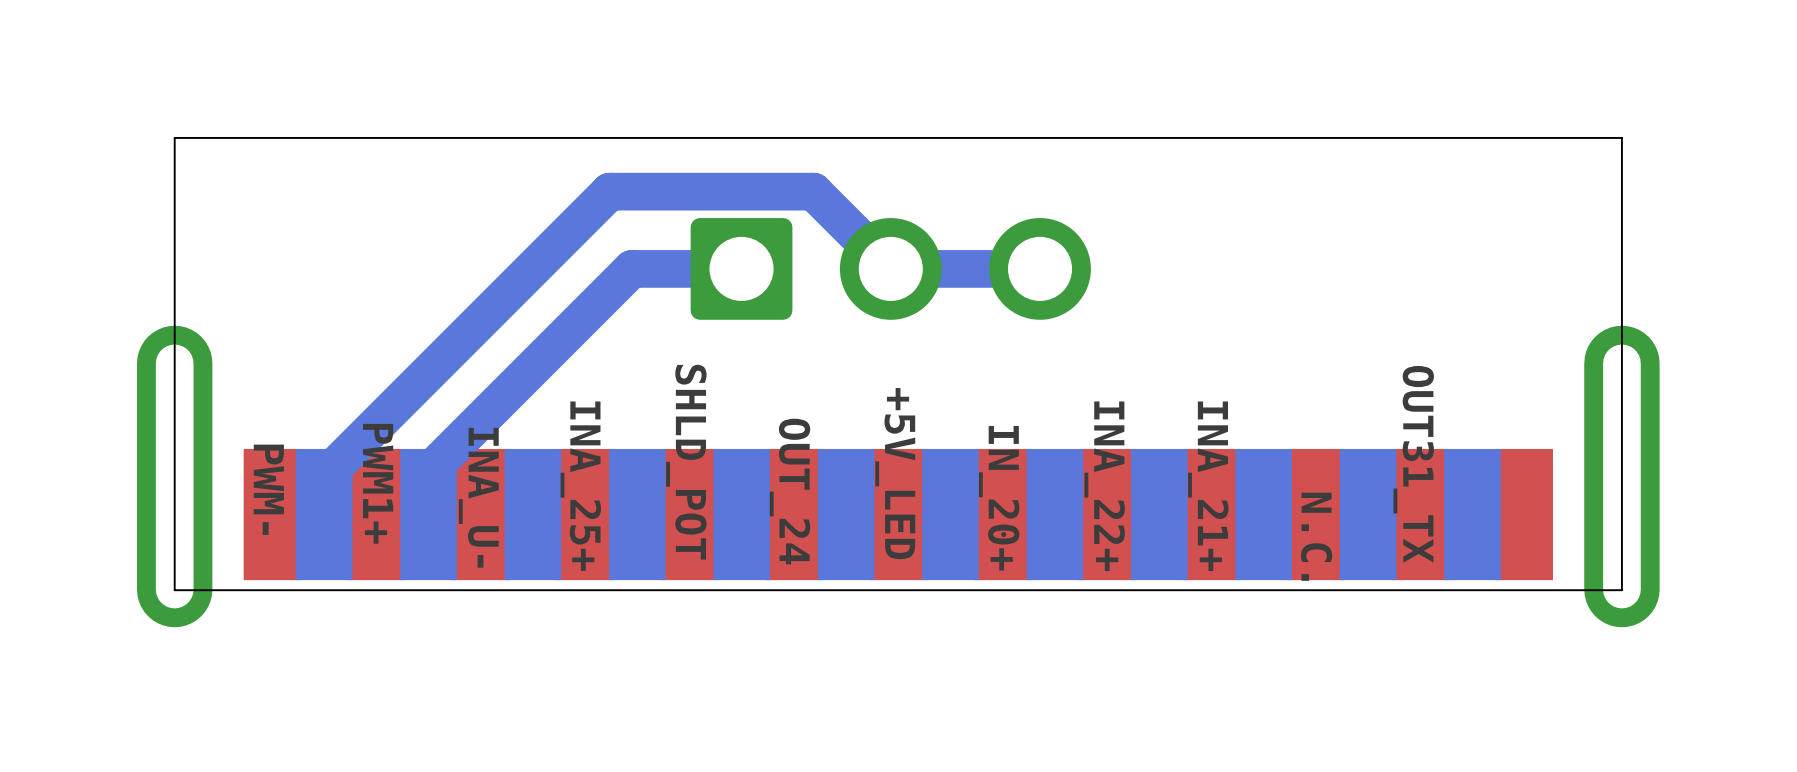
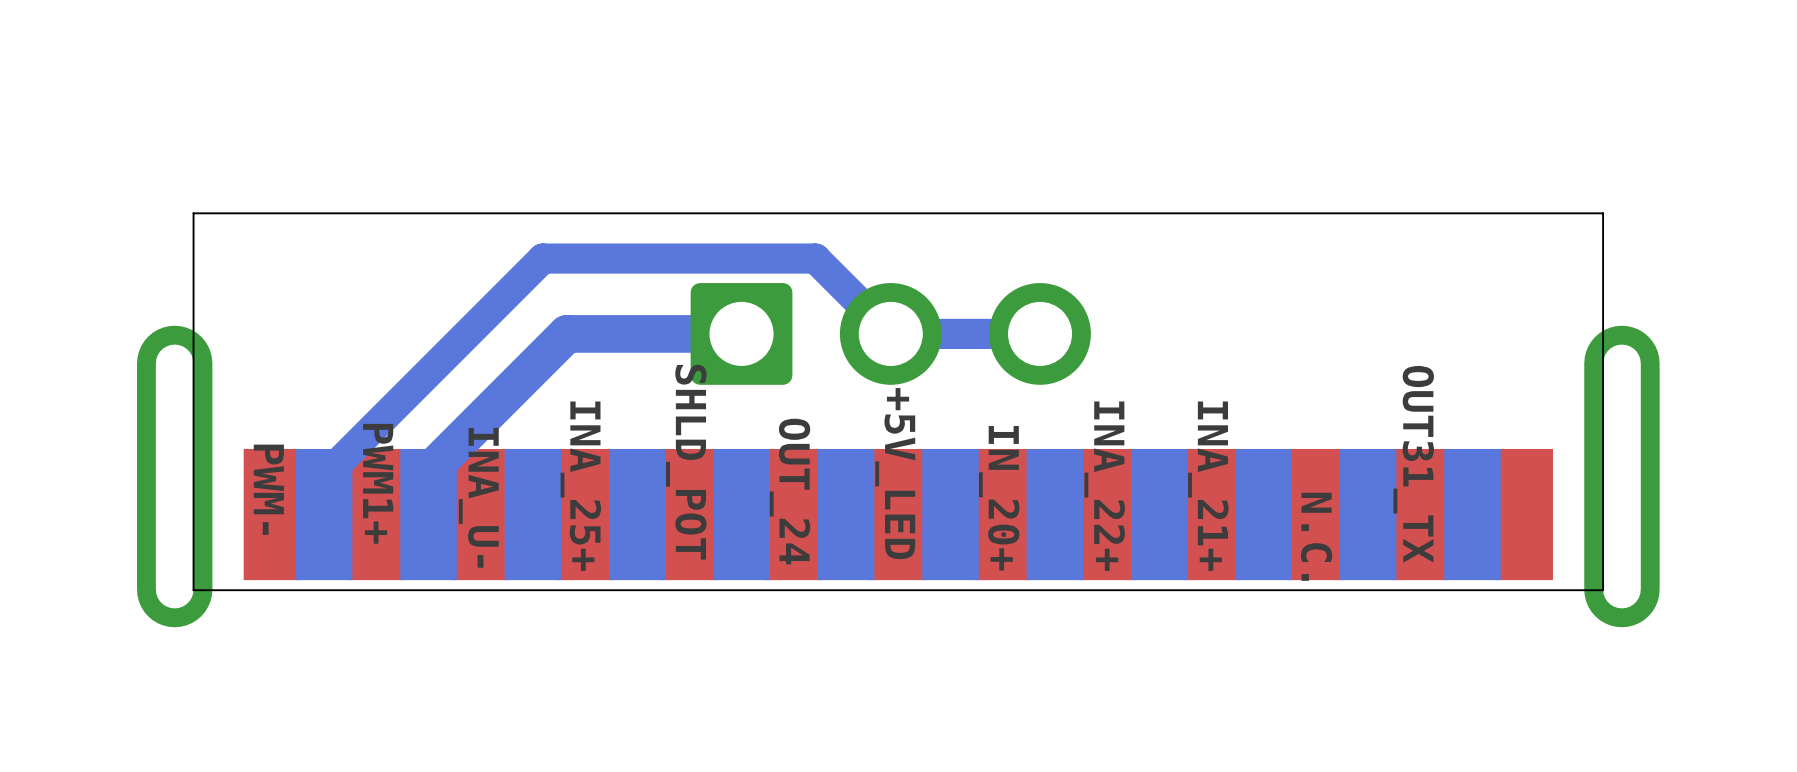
bottom track: (542, 258) (609, 191) (813, 191) (890, 268) (1040, 268) -> (542, 258) (815, 258) (890, 333) (1040, 333)
bottom track width: thick (542, 258) (324, 477) (324, 514) -> thin (542, 258) (324, 477) (324, 514)
bottom track: (741, 268) (631, 268) (566, 333) -> (741, 333) (566, 333)
part position: (890, 268) -> (890, 333)
board edge: (1603, 590) (1621, 590) (1621, 137) (174, 137) (174, 590) (193, 590) -> (1603, 590) (1603, 213) (193, 213) (193, 590)

